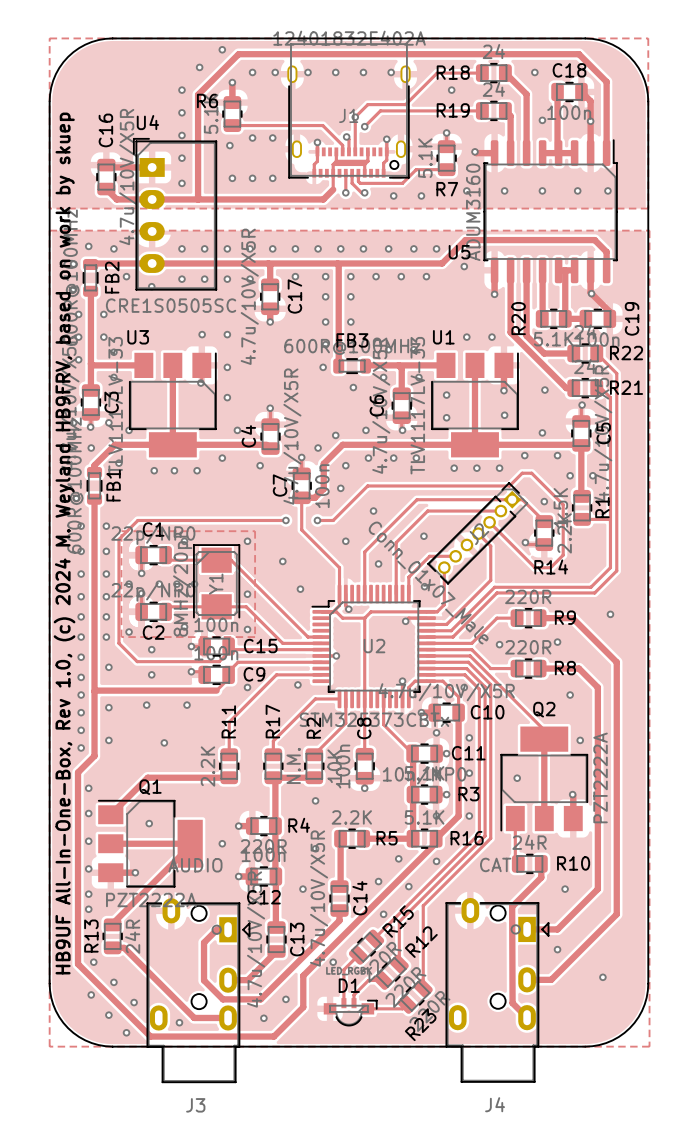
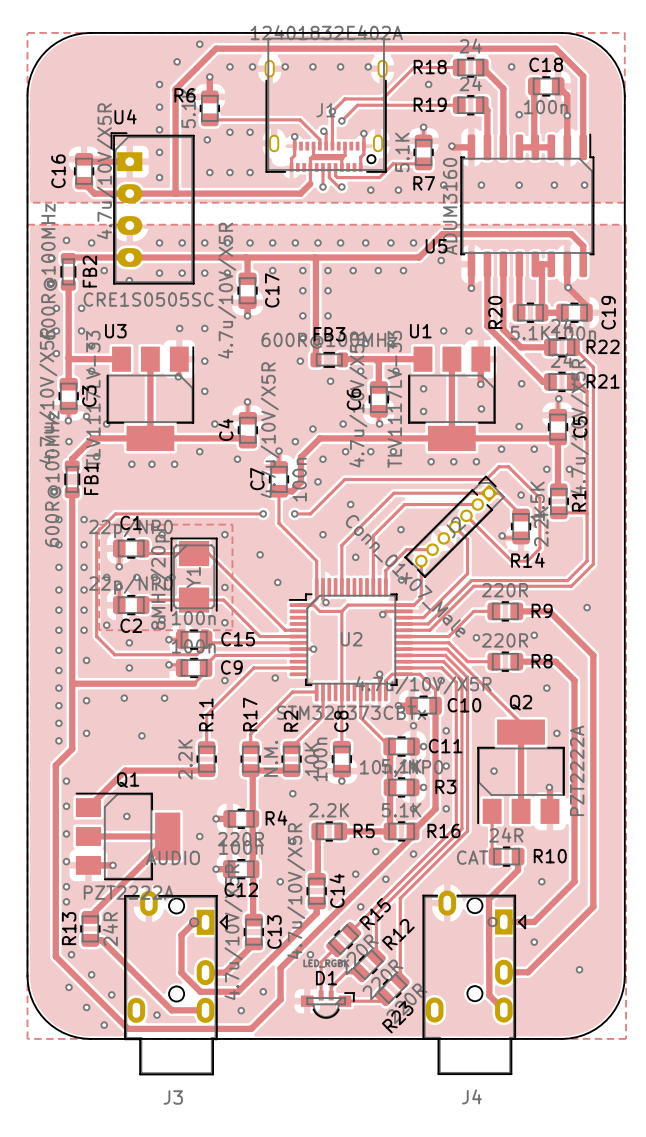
C16 name position: C16 (105, 130) -> C16 (58, 171)
text: HB9UF All-In-One-Box, Rev 1.0, (c) 2024 M. Weyland HB9FRV, based on work by skuep (64, 543) -> none

